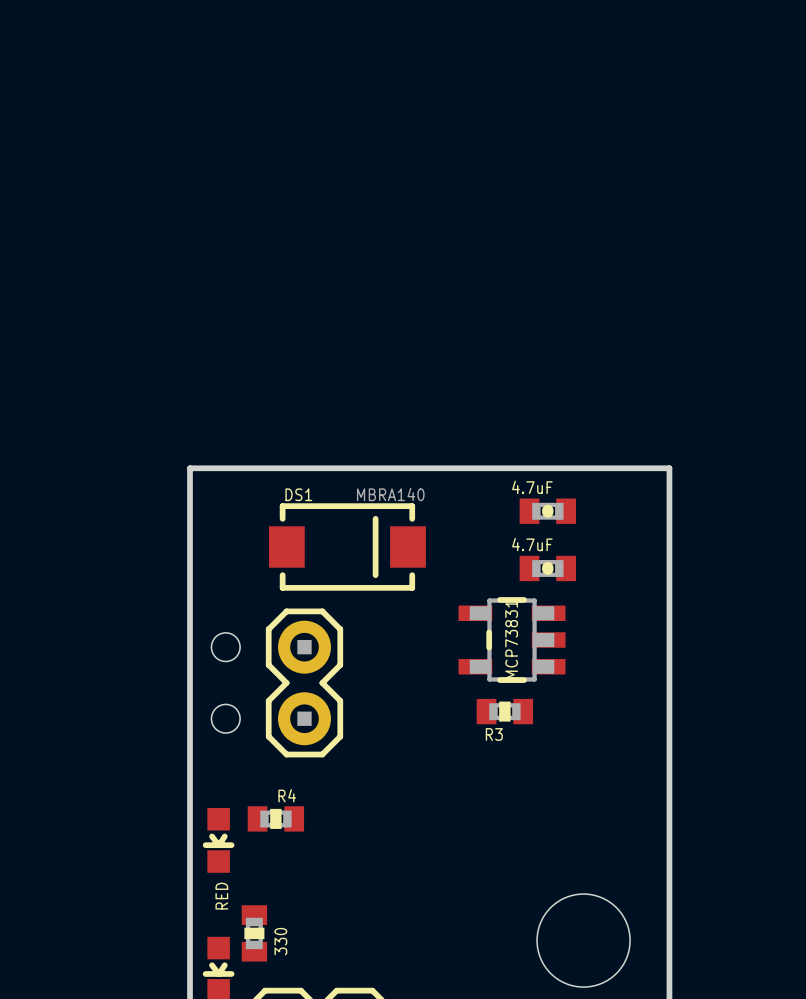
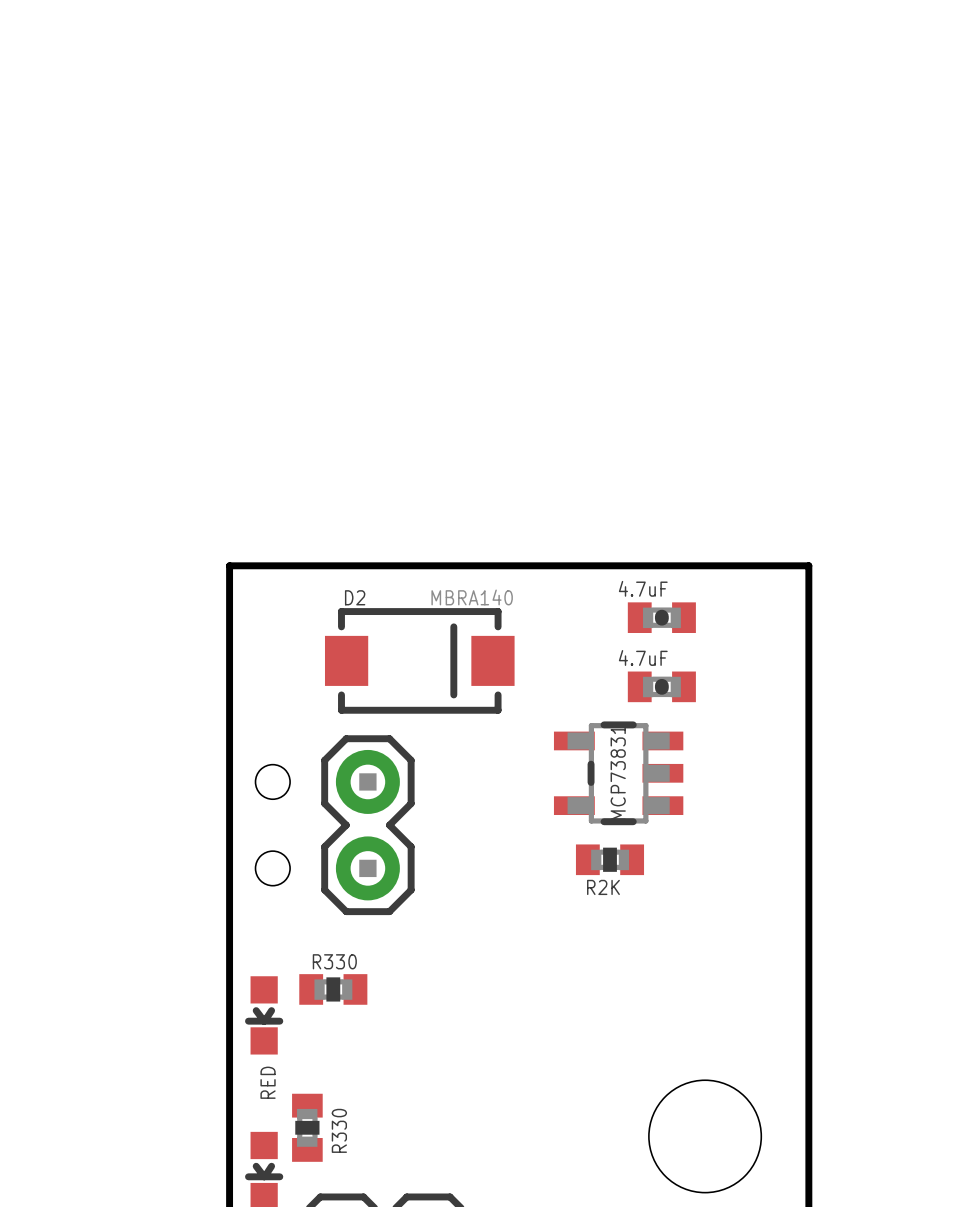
DS1 name: DS1 (298, 494) -> D2 (355, 597)
R3 name: R3 (494, 734) -> R2K (603, 887)
R4 name: R4 (287, 795) -> R330 (334, 961)
part value: 330 (280, 941) -> R330 (339, 1130)

